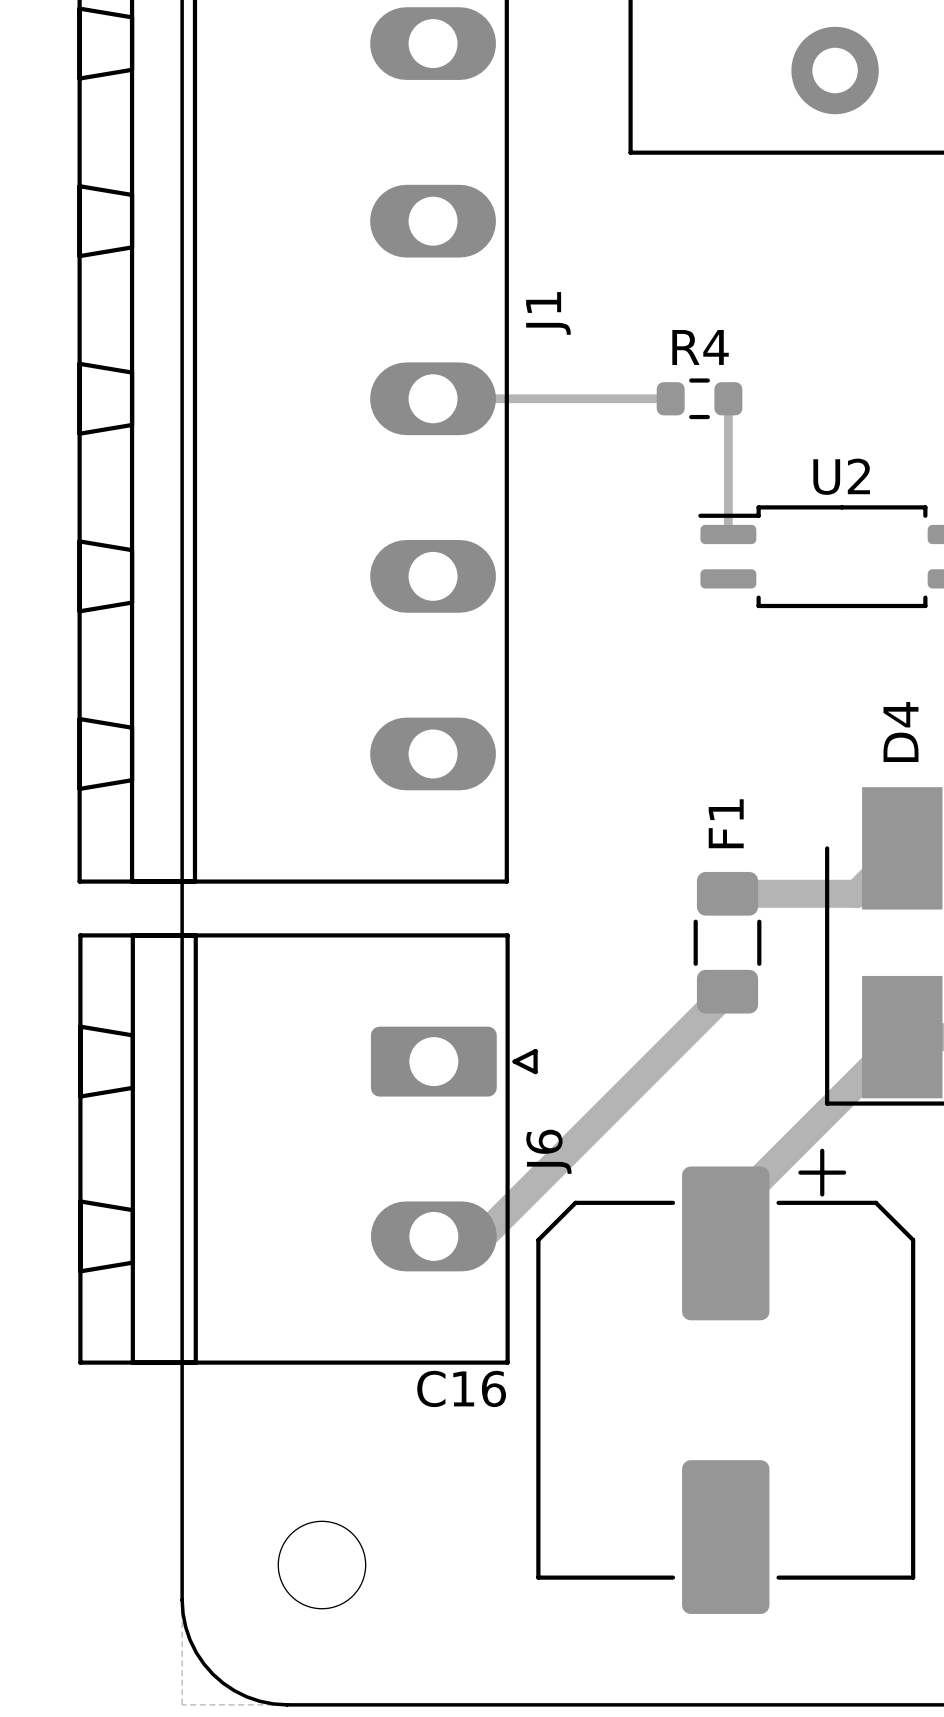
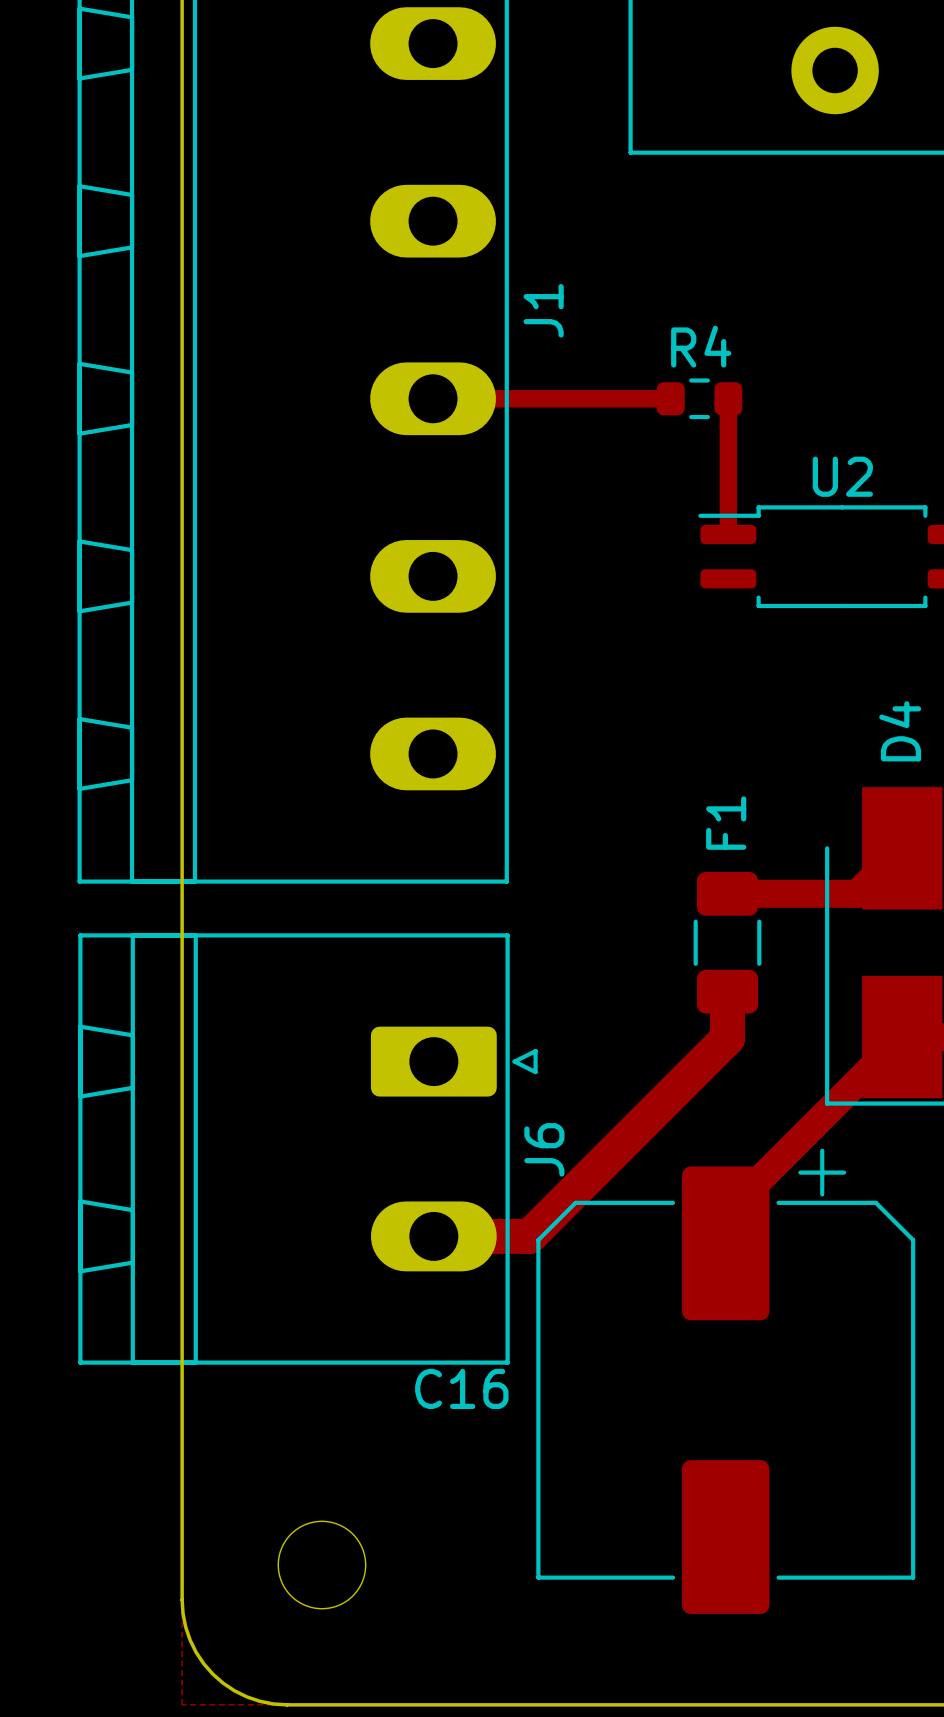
track width: thin (433, 398) (670, 398) -> thick (433, 398) (670, 398)
track width: thin (728, 398) (728, 534) -> thick (728, 398) (728, 534)
track: (727, 991) (482, 1236) -> (727, 991) (727, 1038) (529, 1236) (482, 1236)

